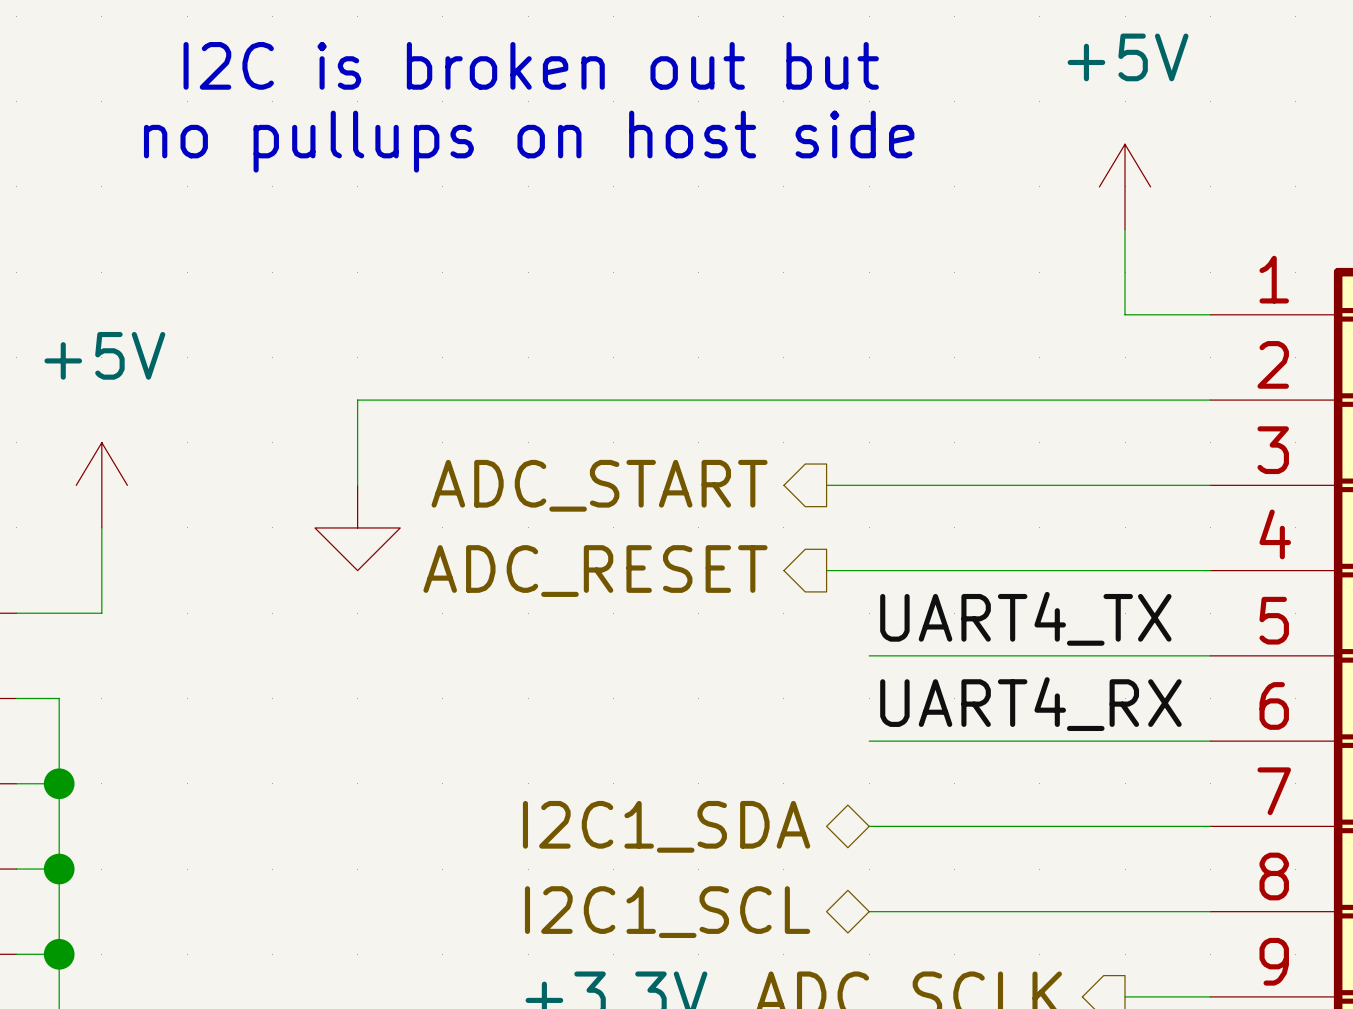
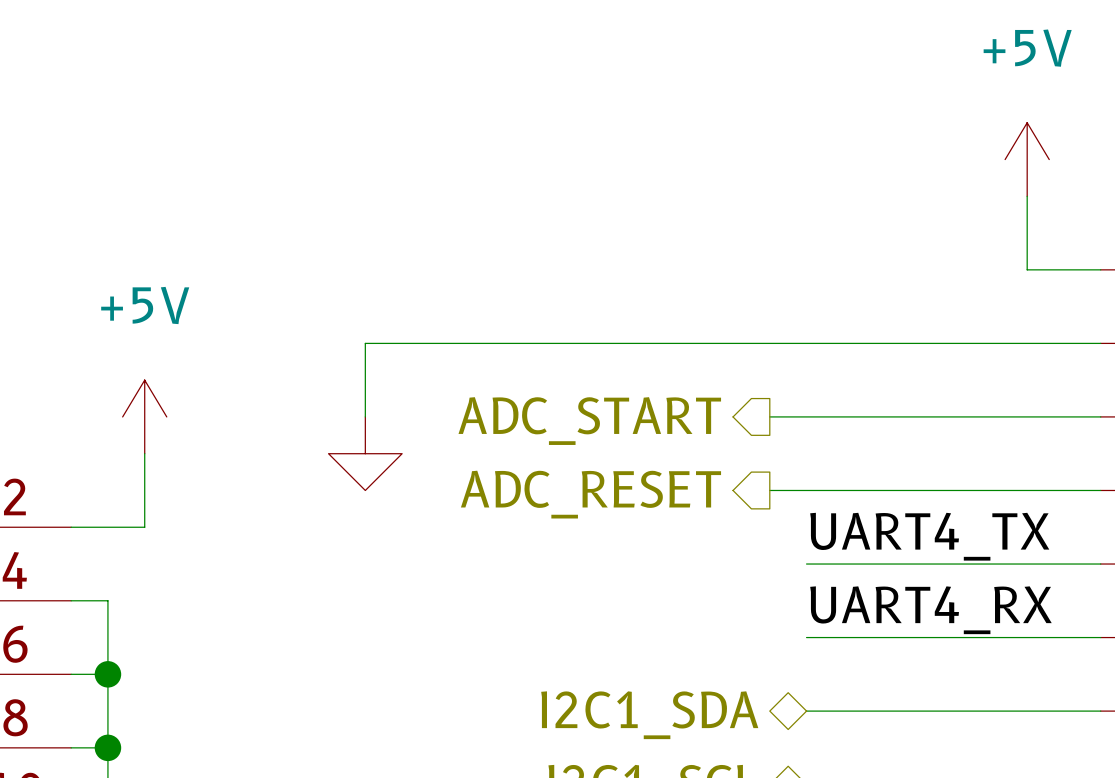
text: I2C is broken out but (531, 65) -> none
text: no pullups on host side (529, 141) -> none

